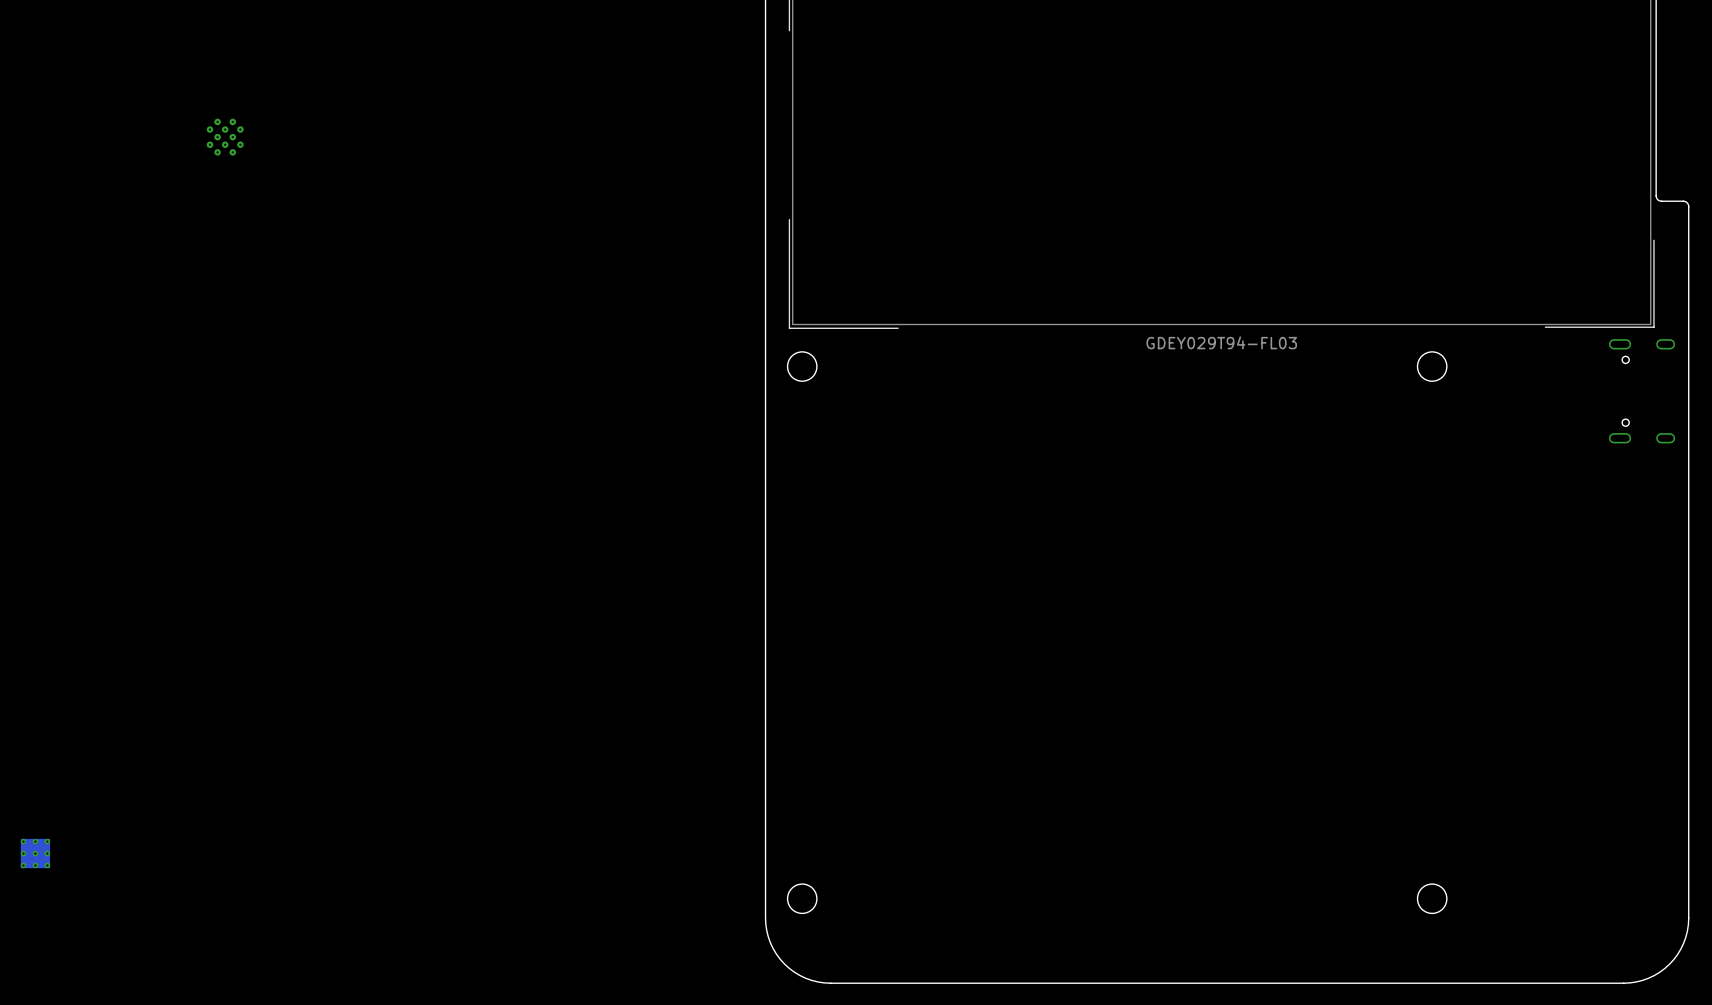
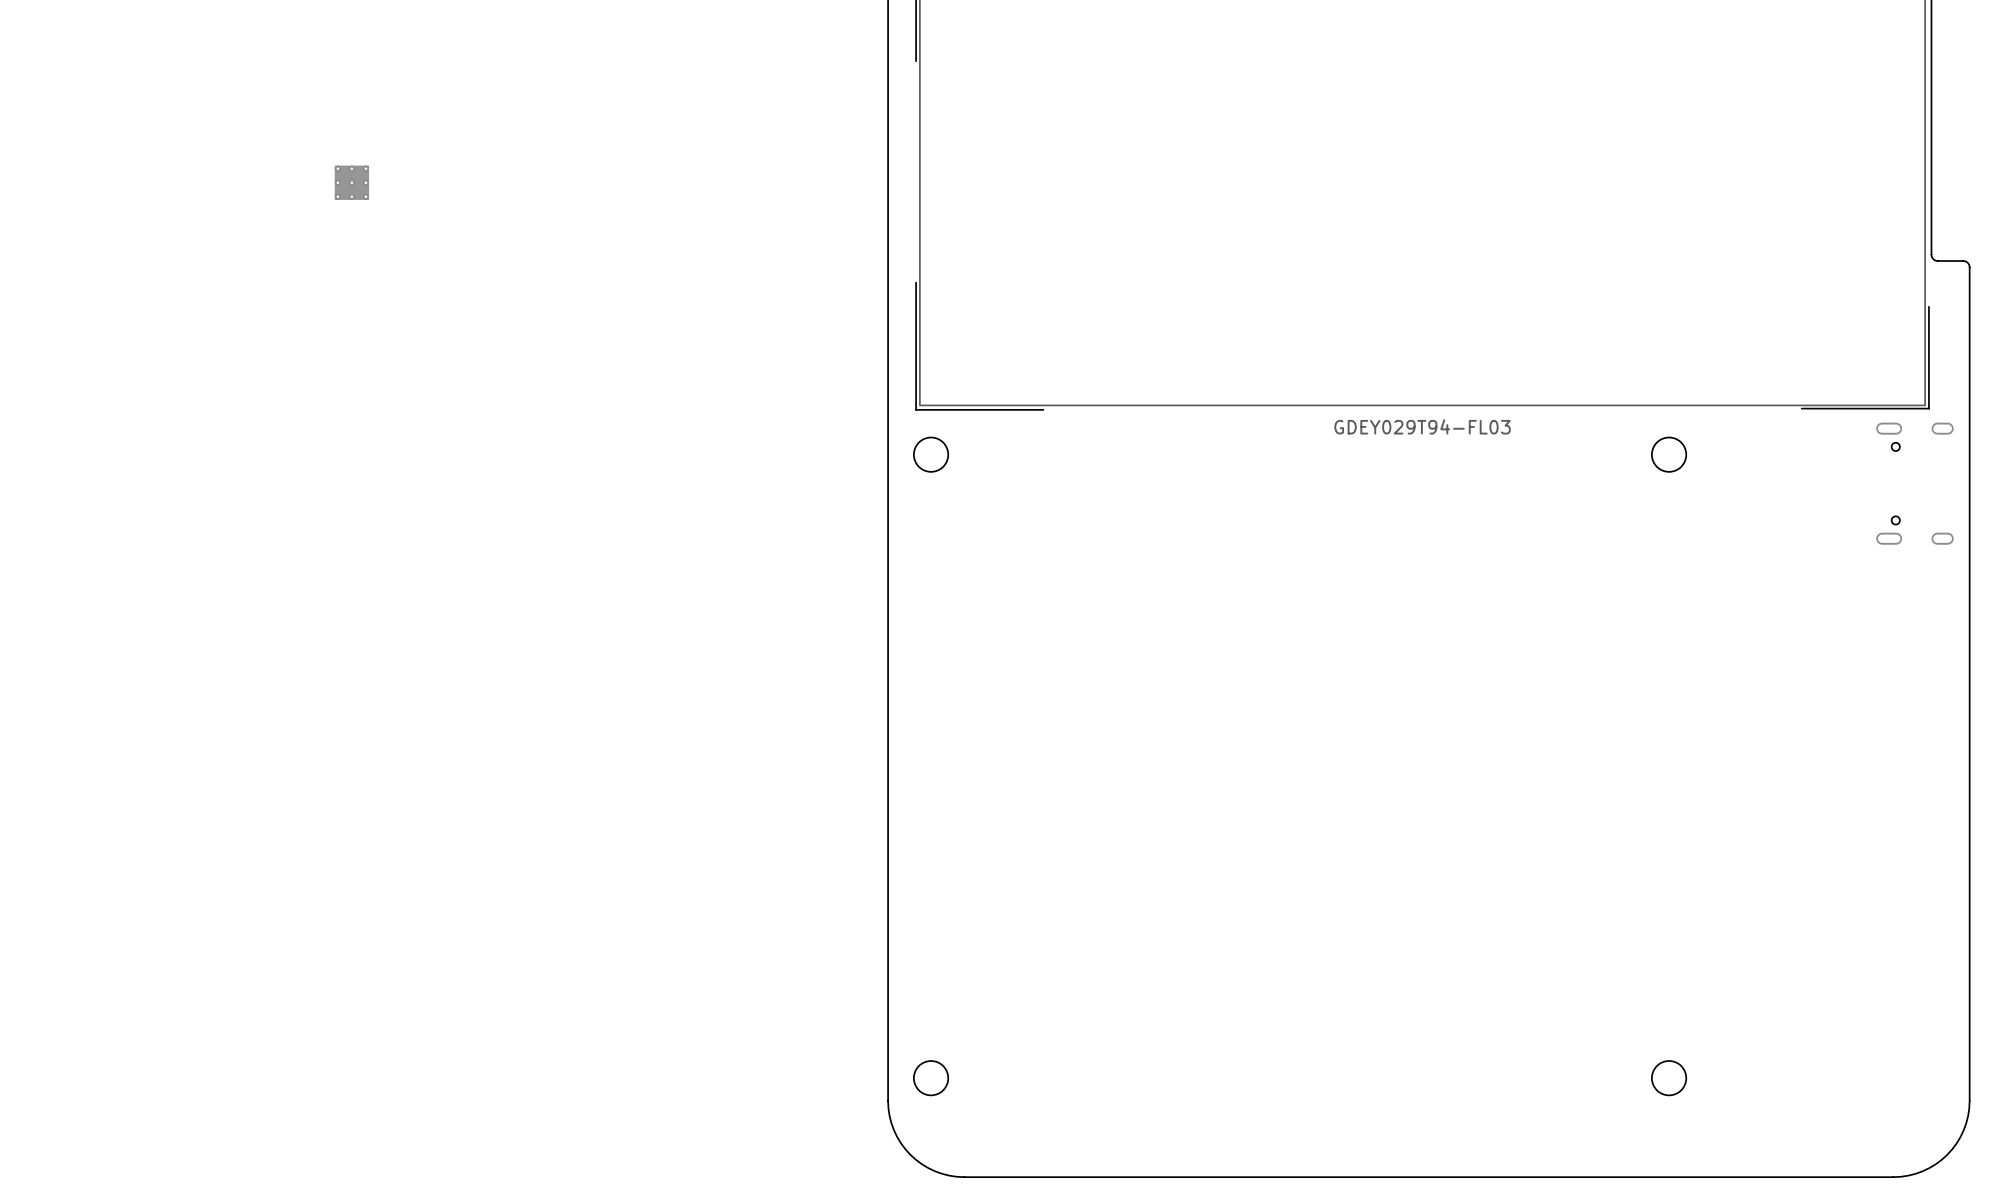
part: none -> (351, 182)
part: (225, 137) -> none
part: (35, 853) -> none

